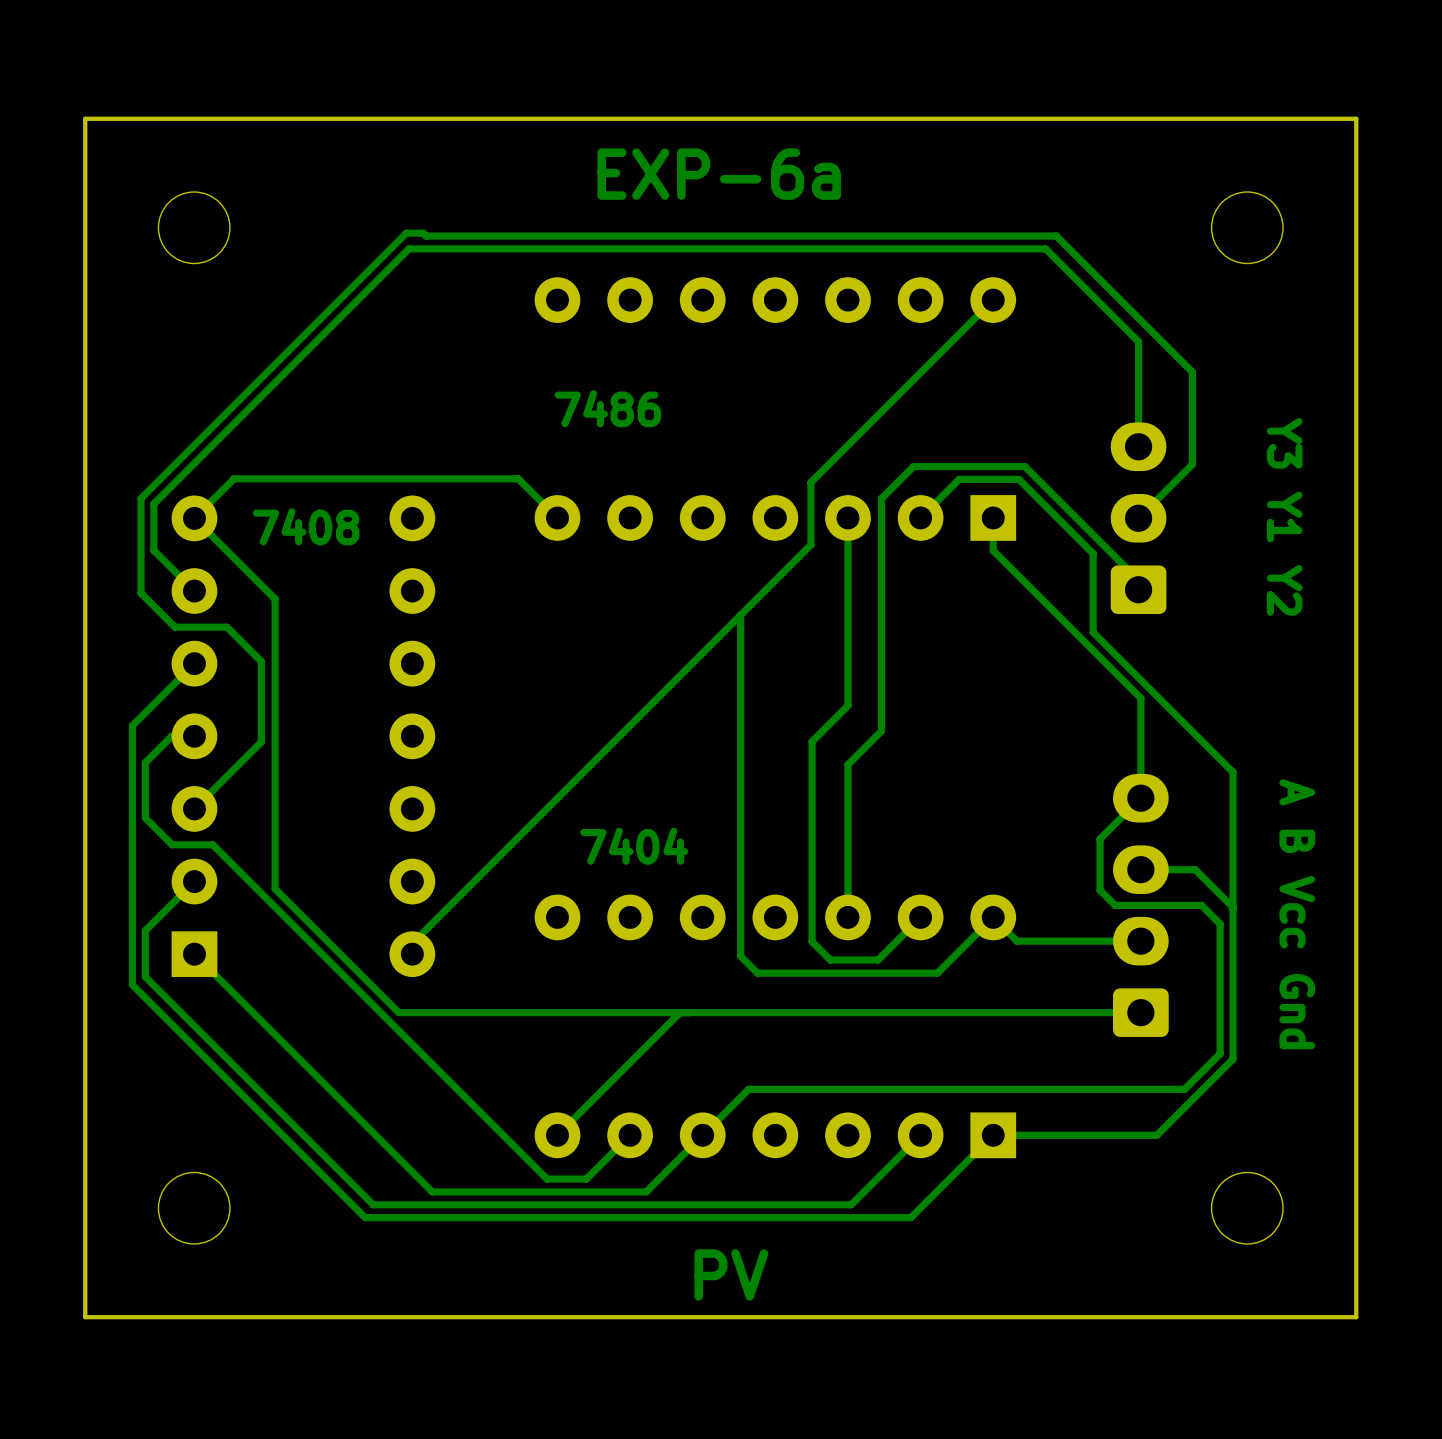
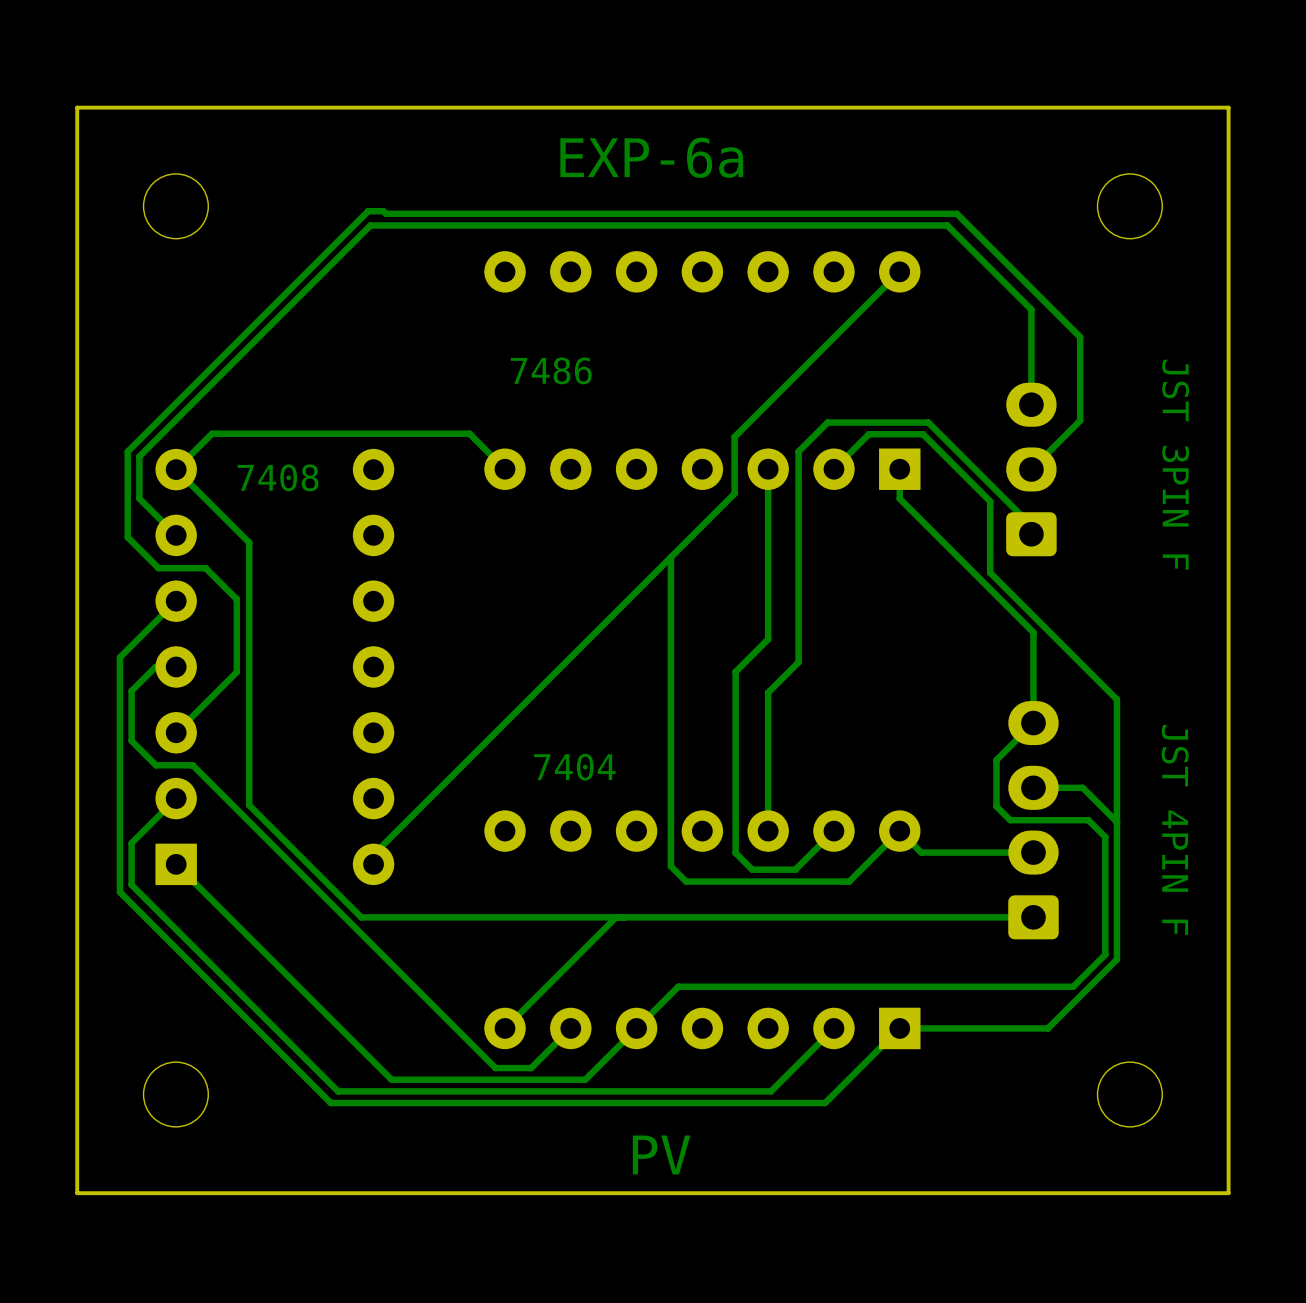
part value: Y3 Y1 Y2 (1284, 516) -> JST 3PIN F (1175, 464)
part value: A B Vcc Gnd (1297, 914) -> JST 4PIN F (1175, 829)

